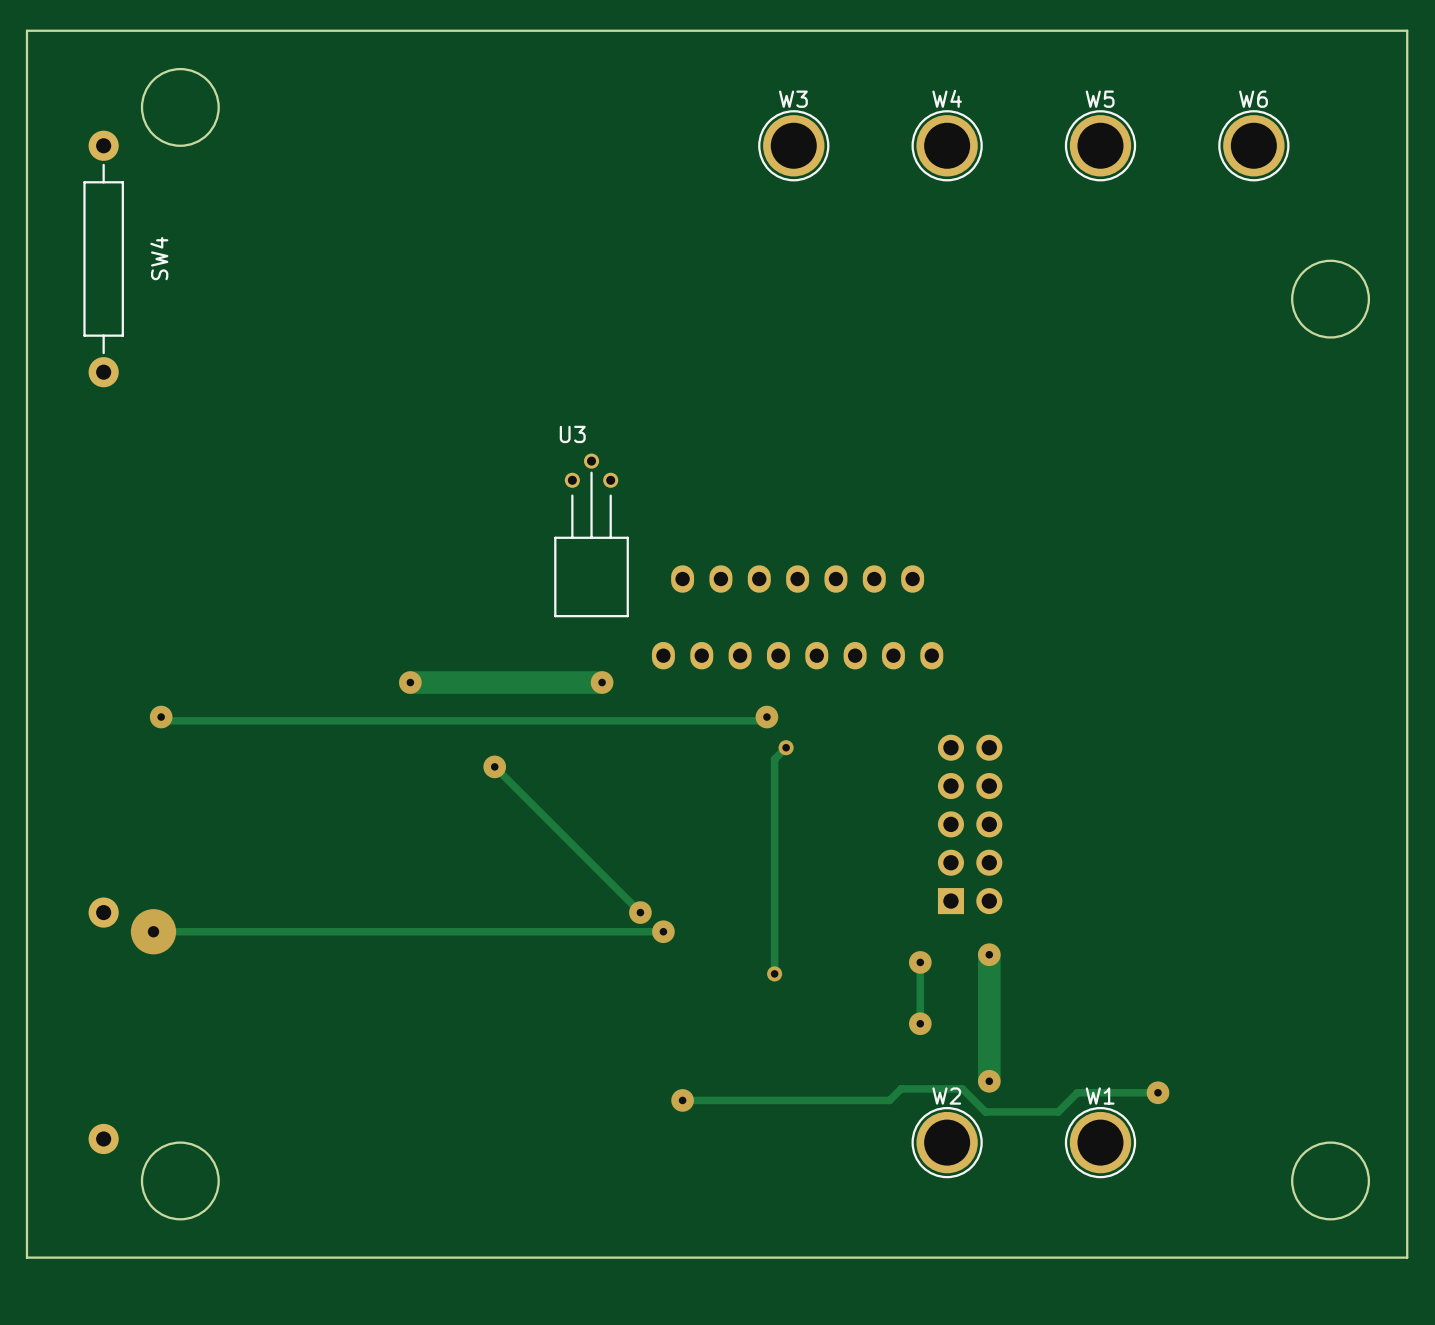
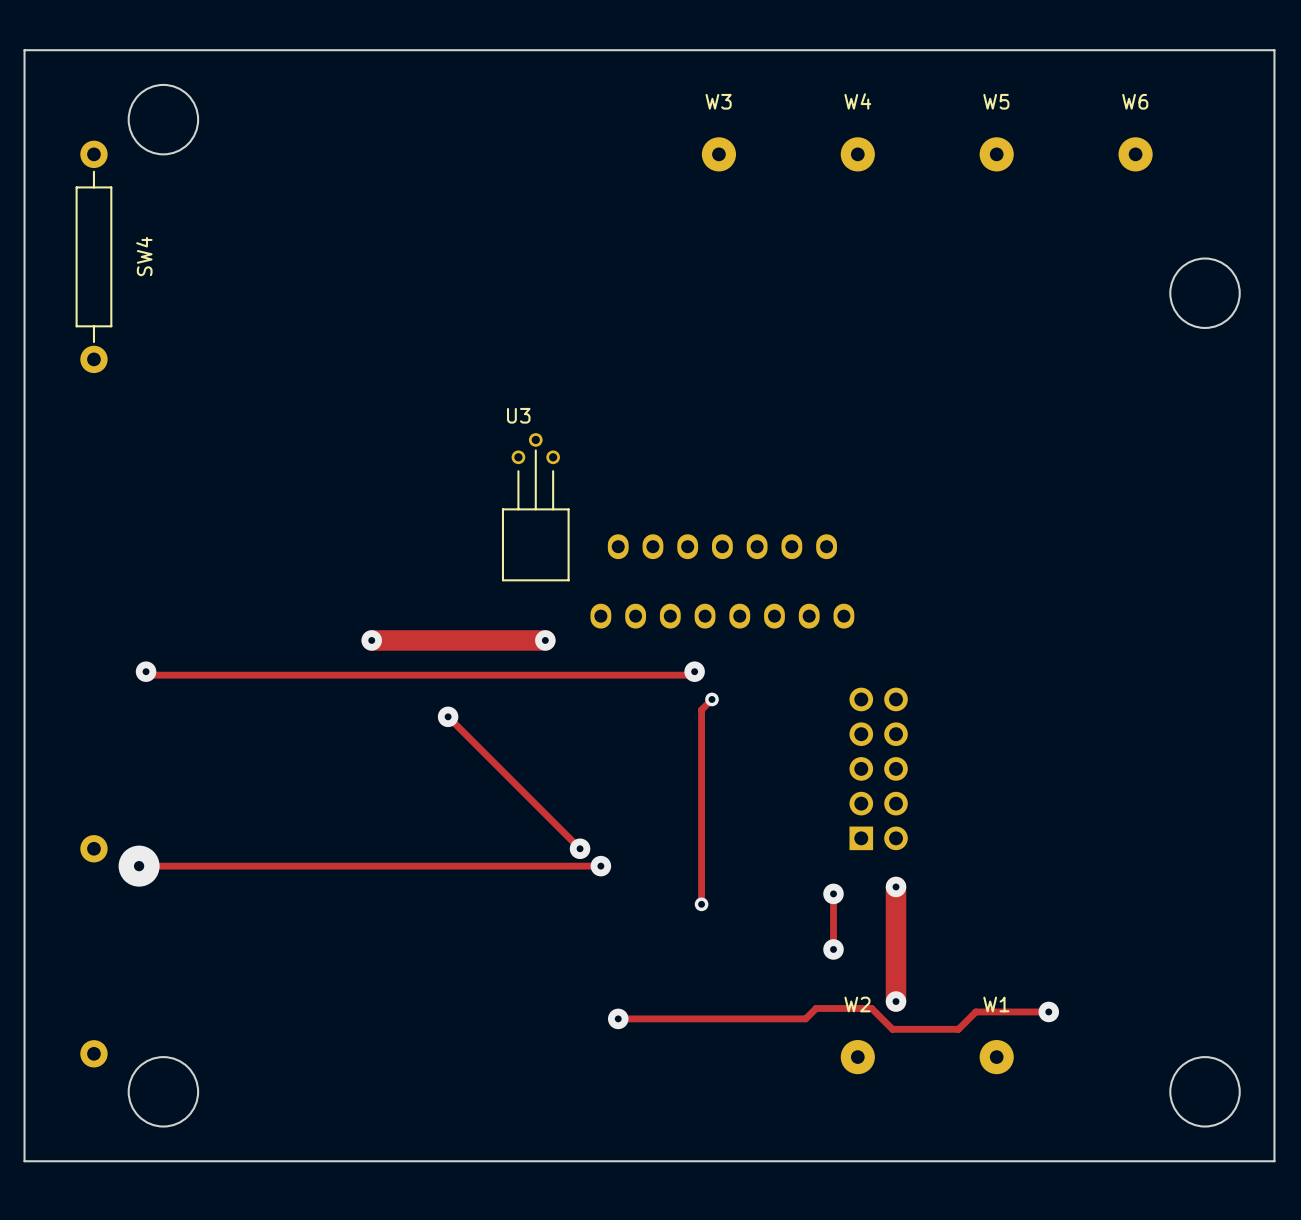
W3 footprint: [758, 110, 830, 182] -> [701, 137, 737, 172]
W4 footprint: [911, 110, 983, 182] -> [840, 137, 875, 172]
W5 footprint: [1064, 110, 1137, 182] -> [979, 137, 1014, 172]
W6 footprint: [1218, 110, 1290, 182] -> [1118, 137, 1153, 172]
W2 footprint: [911, 1106, 983, 1179] -> [840, 1040, 875, 1075]
W1 footprint: [1064, 1106, 1137, 1179] -> [979, 1040, 1014, 1075]

